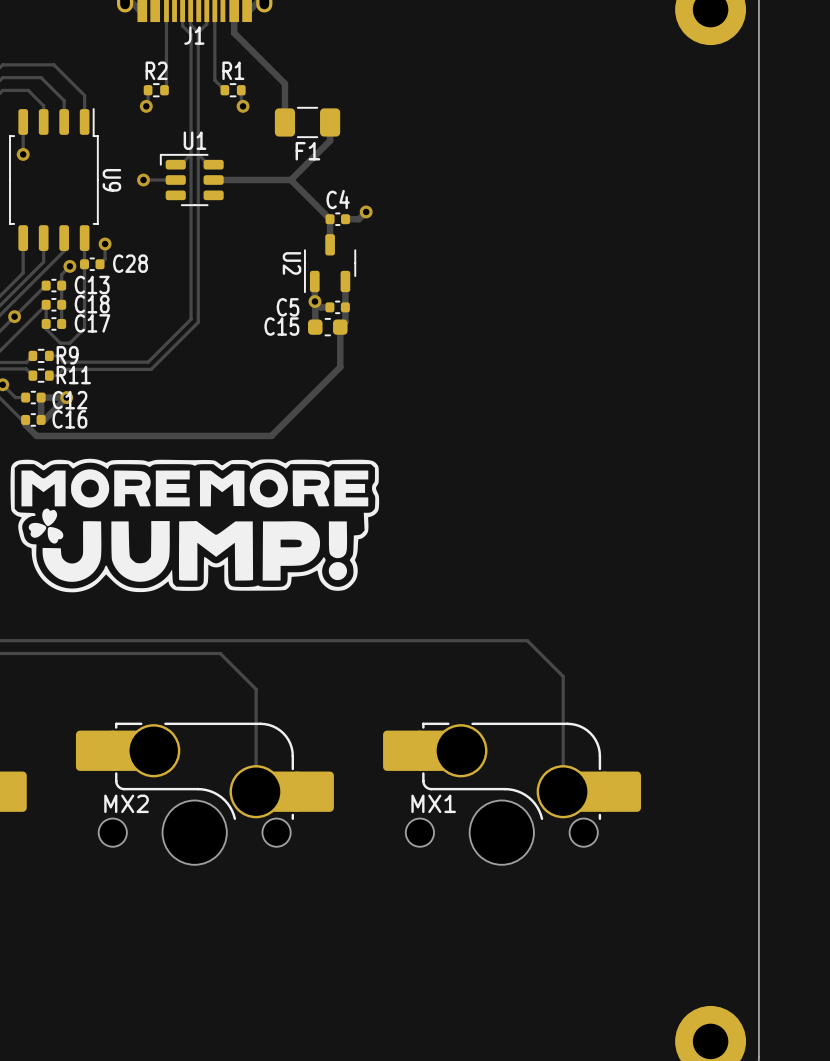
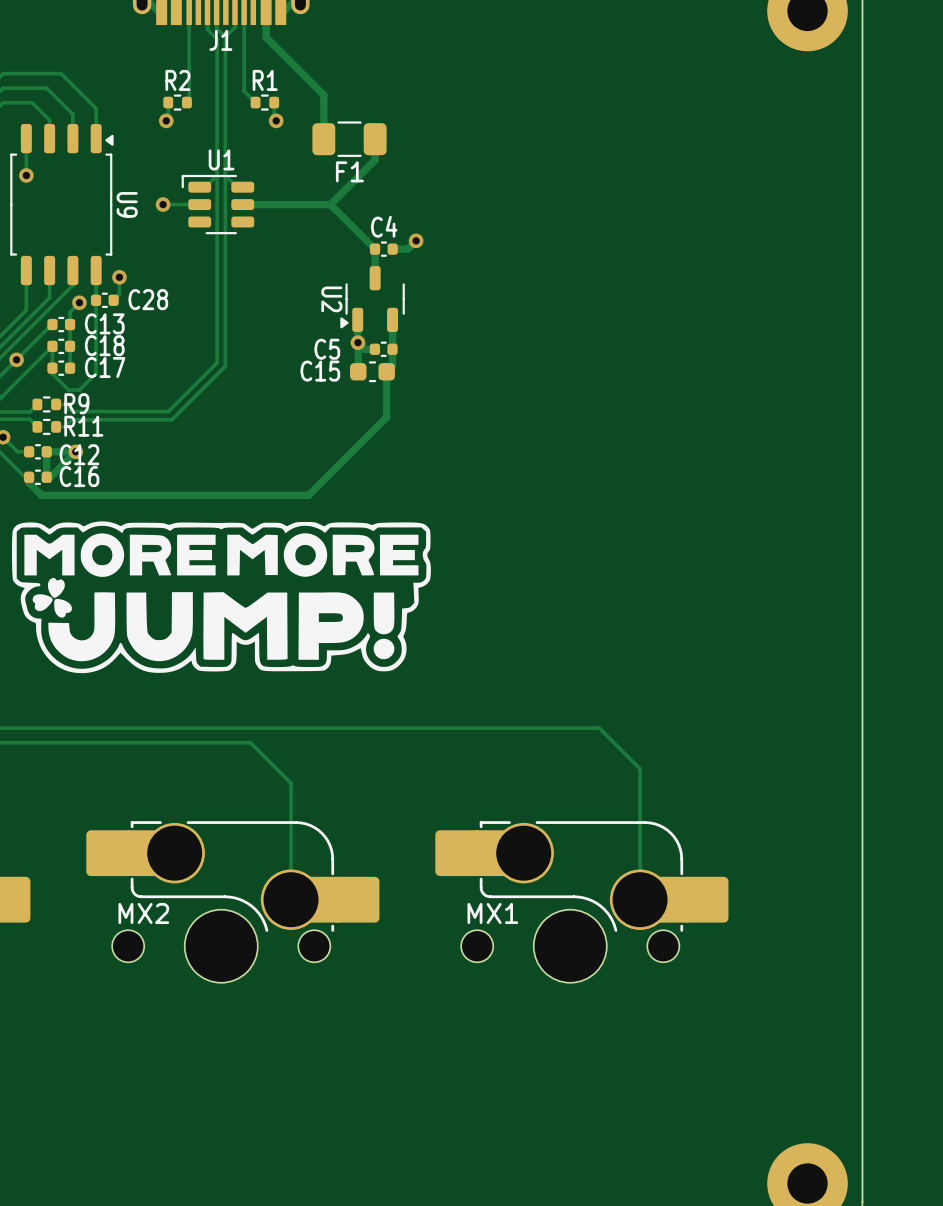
U9 footprint: [9, 108, 99, 251] -> [10, 123, 114, 286]
U2 footprint: [303, 234, 357, 294] -> [340, 266, 405, 333]

